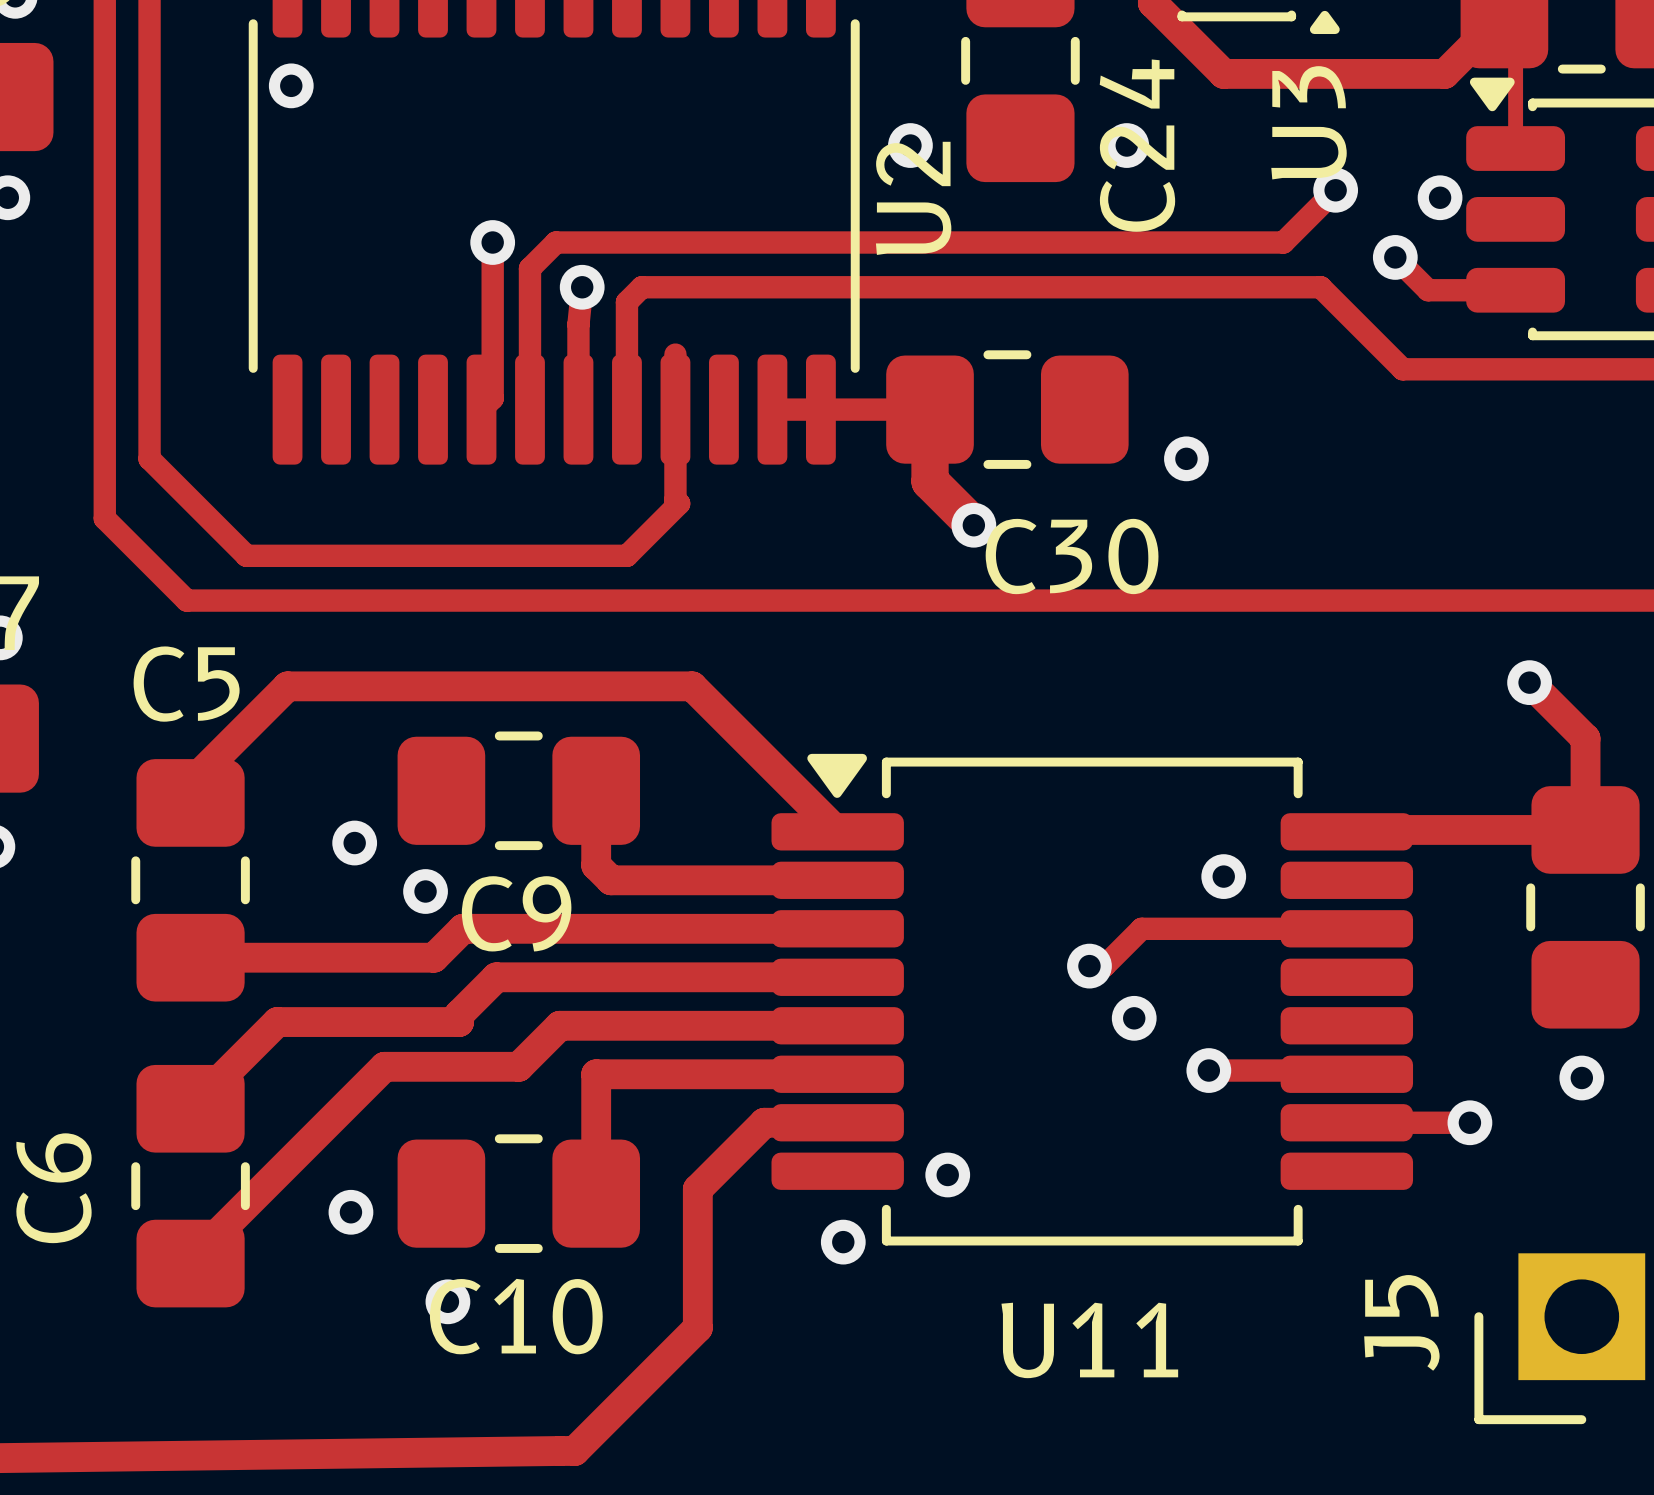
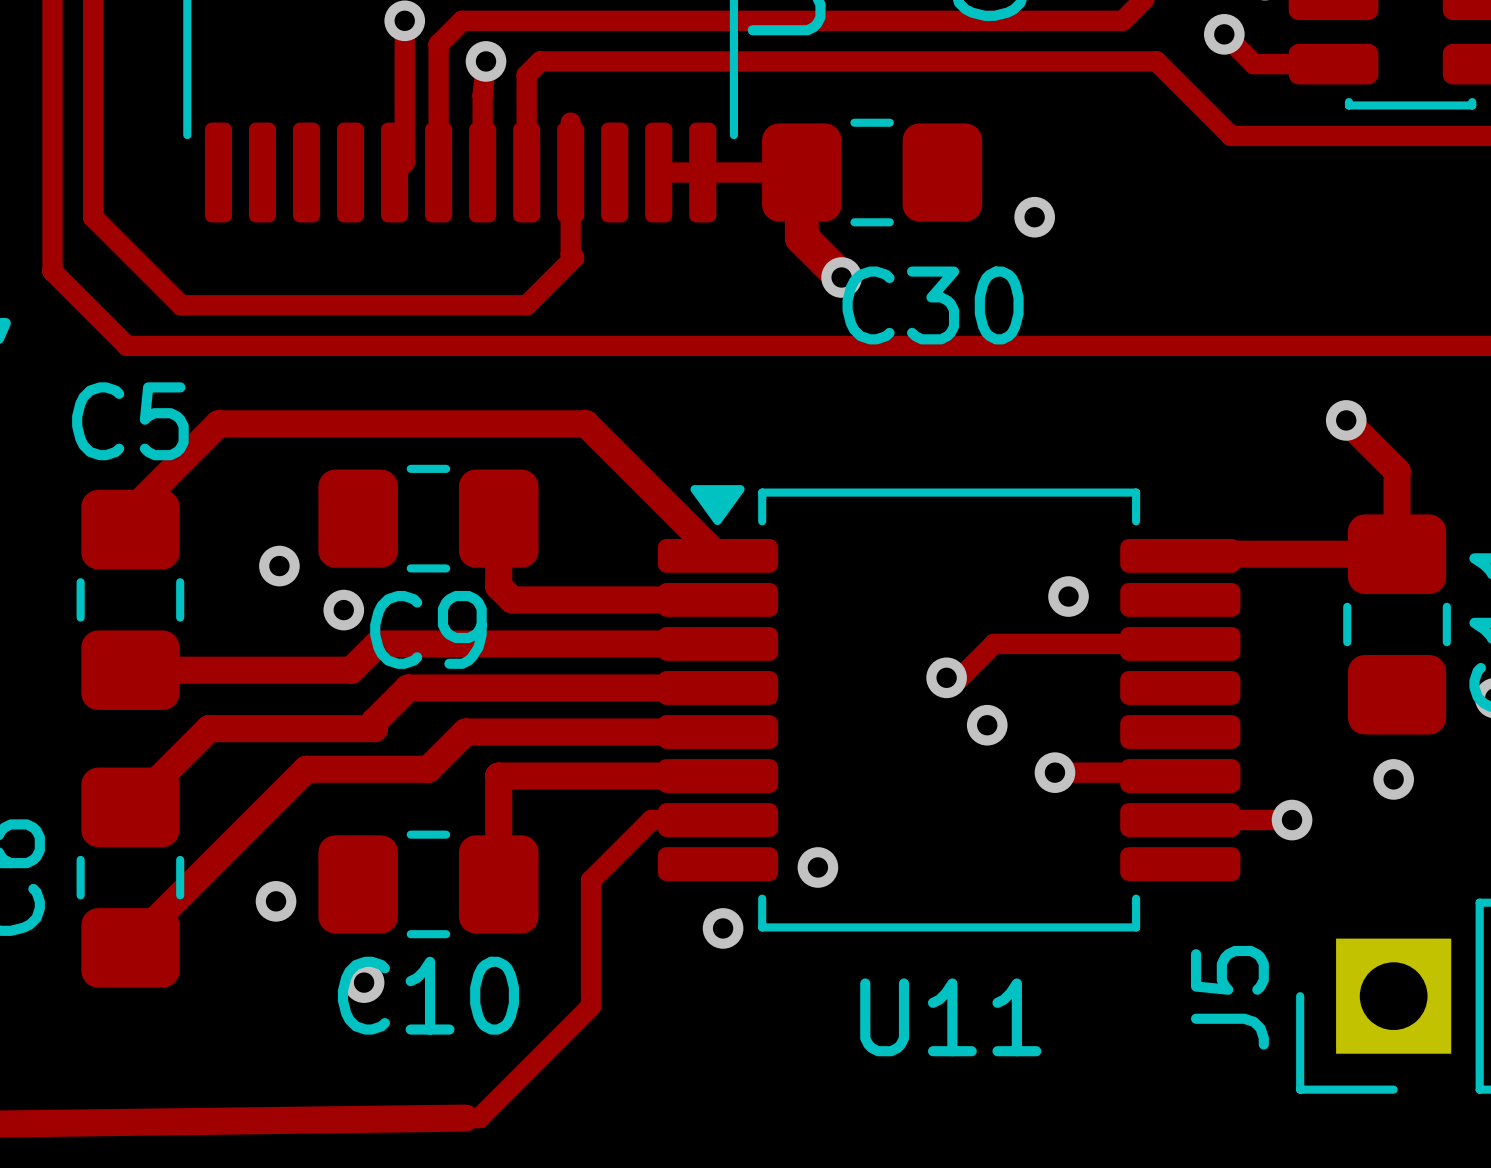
top track width: thick (837, 1122) (764, 1122) (697, 1189) (697, 1327) (574, 1450) (559, 1450) -> thin (718, 820) (651, 820) (591, 880) (591, 1006) (479, 1118) (465, 1118)

